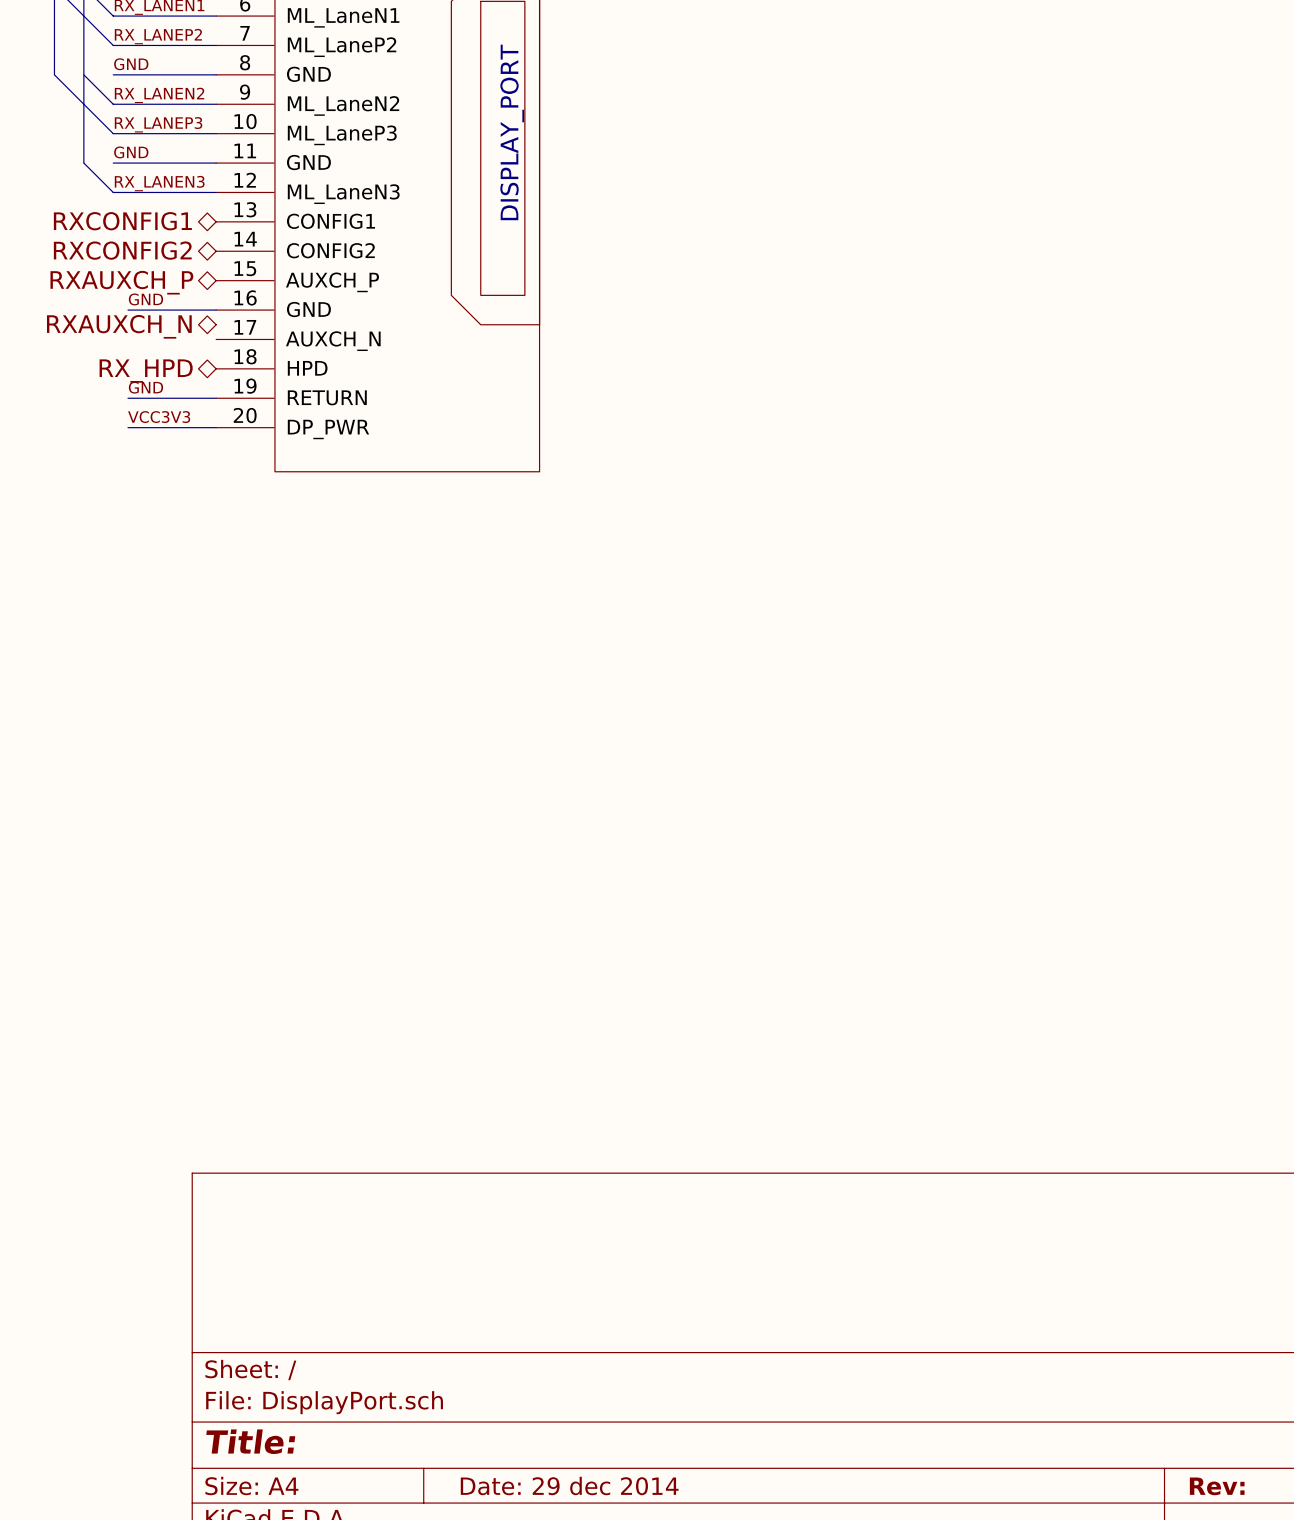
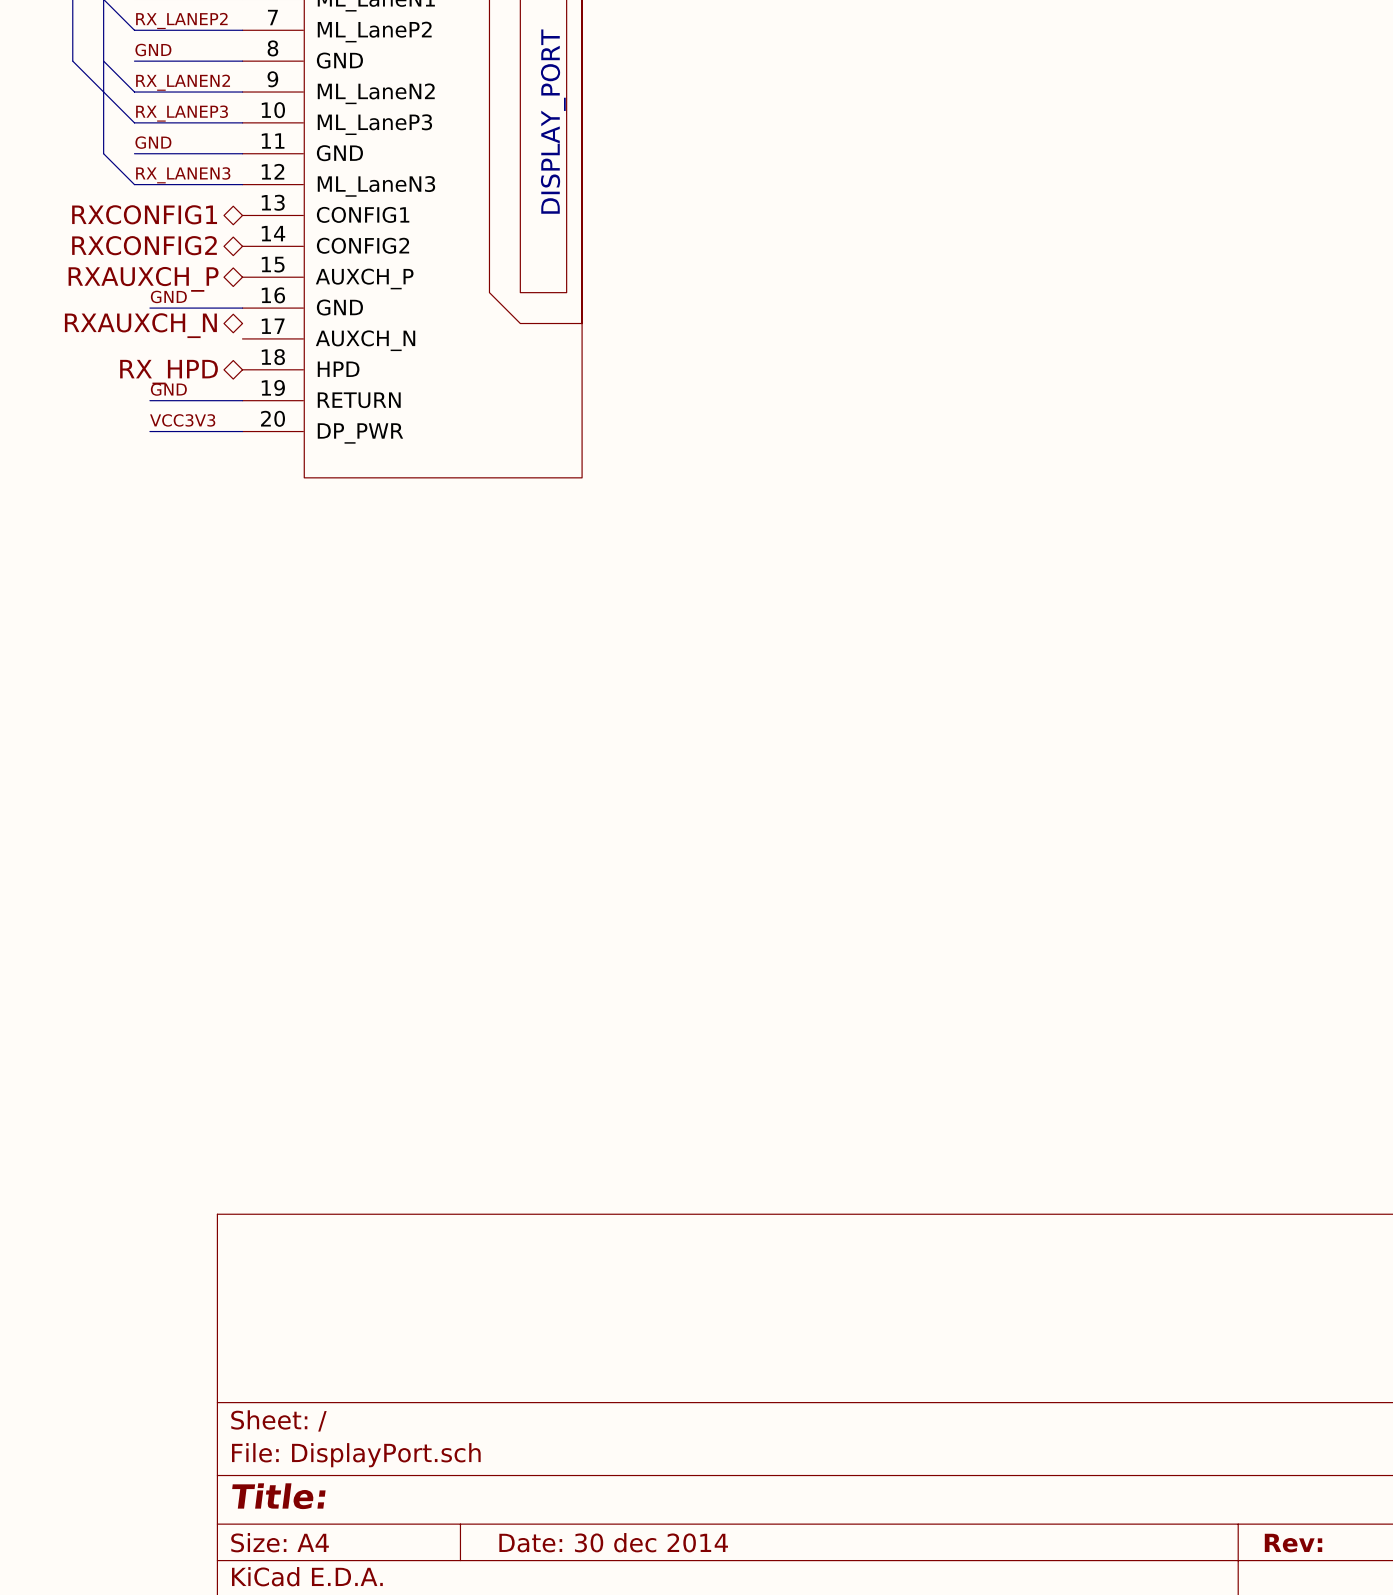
title block: Date: 29 dec 2014 (569, 1486) -> Date: 30 dec 2014 (613, 1542)

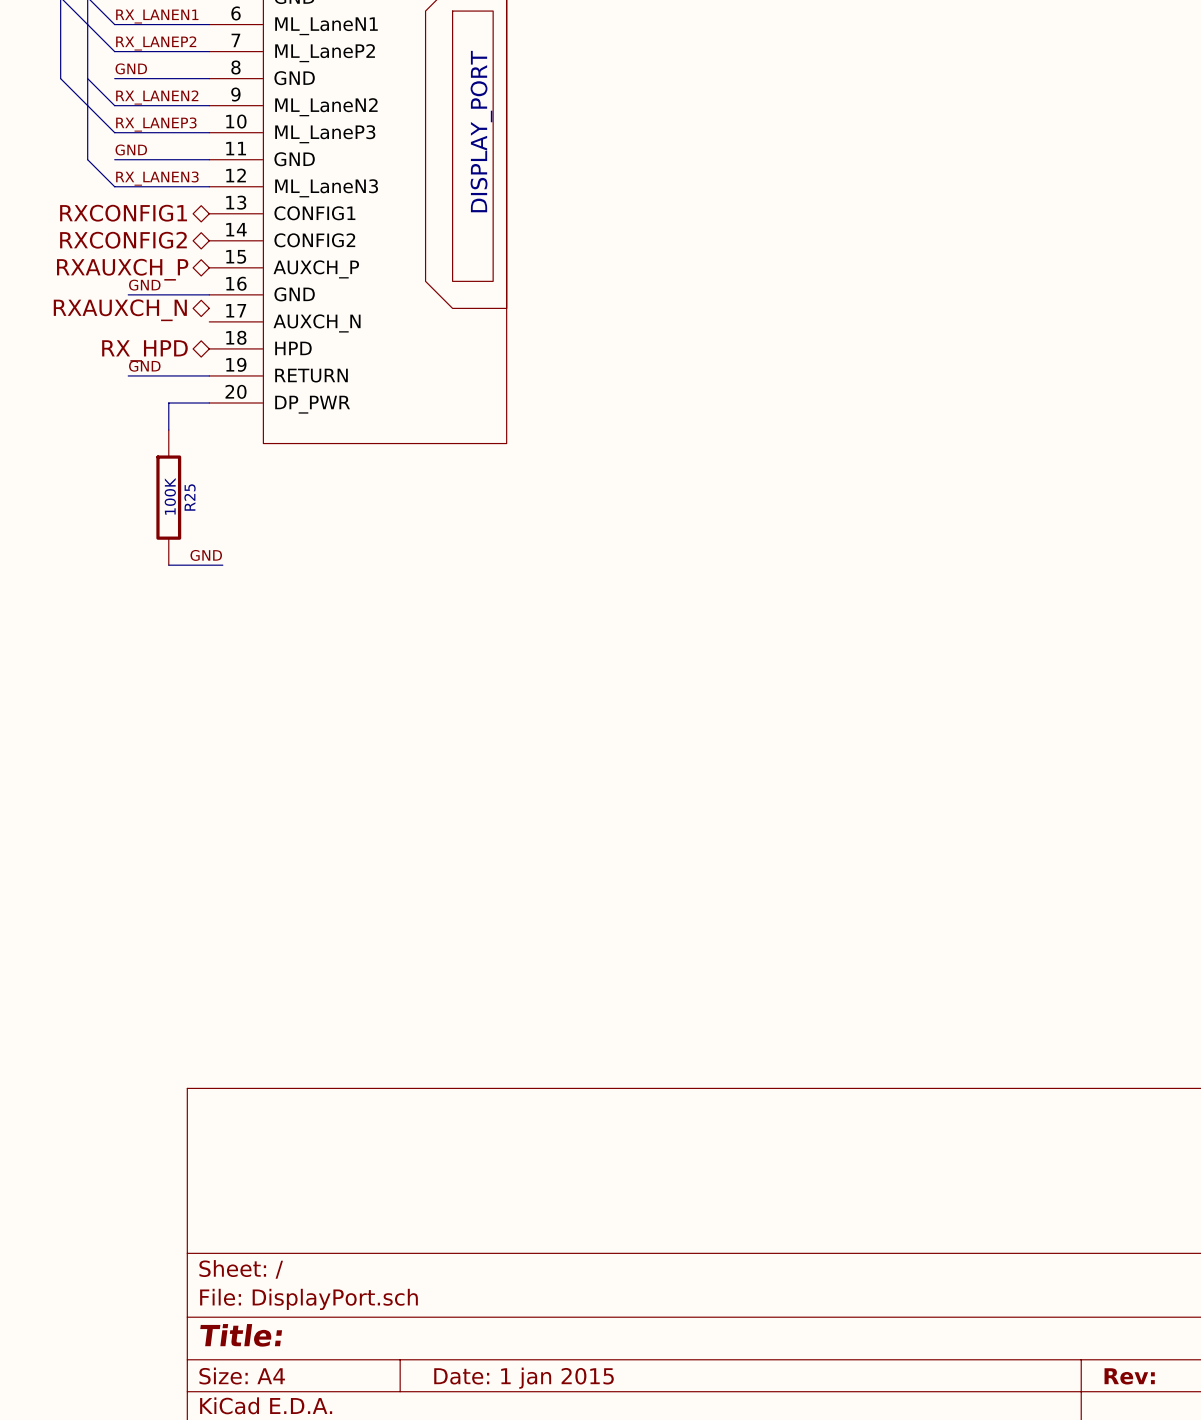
label: VCC3V3 (182, 420) -> none
wire: (149, 431) (196, 431) -> (168, 430) (168, 403)
R25: none -> 100K (168, 497)
label: none -> GND (206, 555)
wire: none -> (168, 565) (222, 565)
title block: Date: 30 dec 2014 (613, 1542) -> Date: 1 jan 2015 (524, 1378)

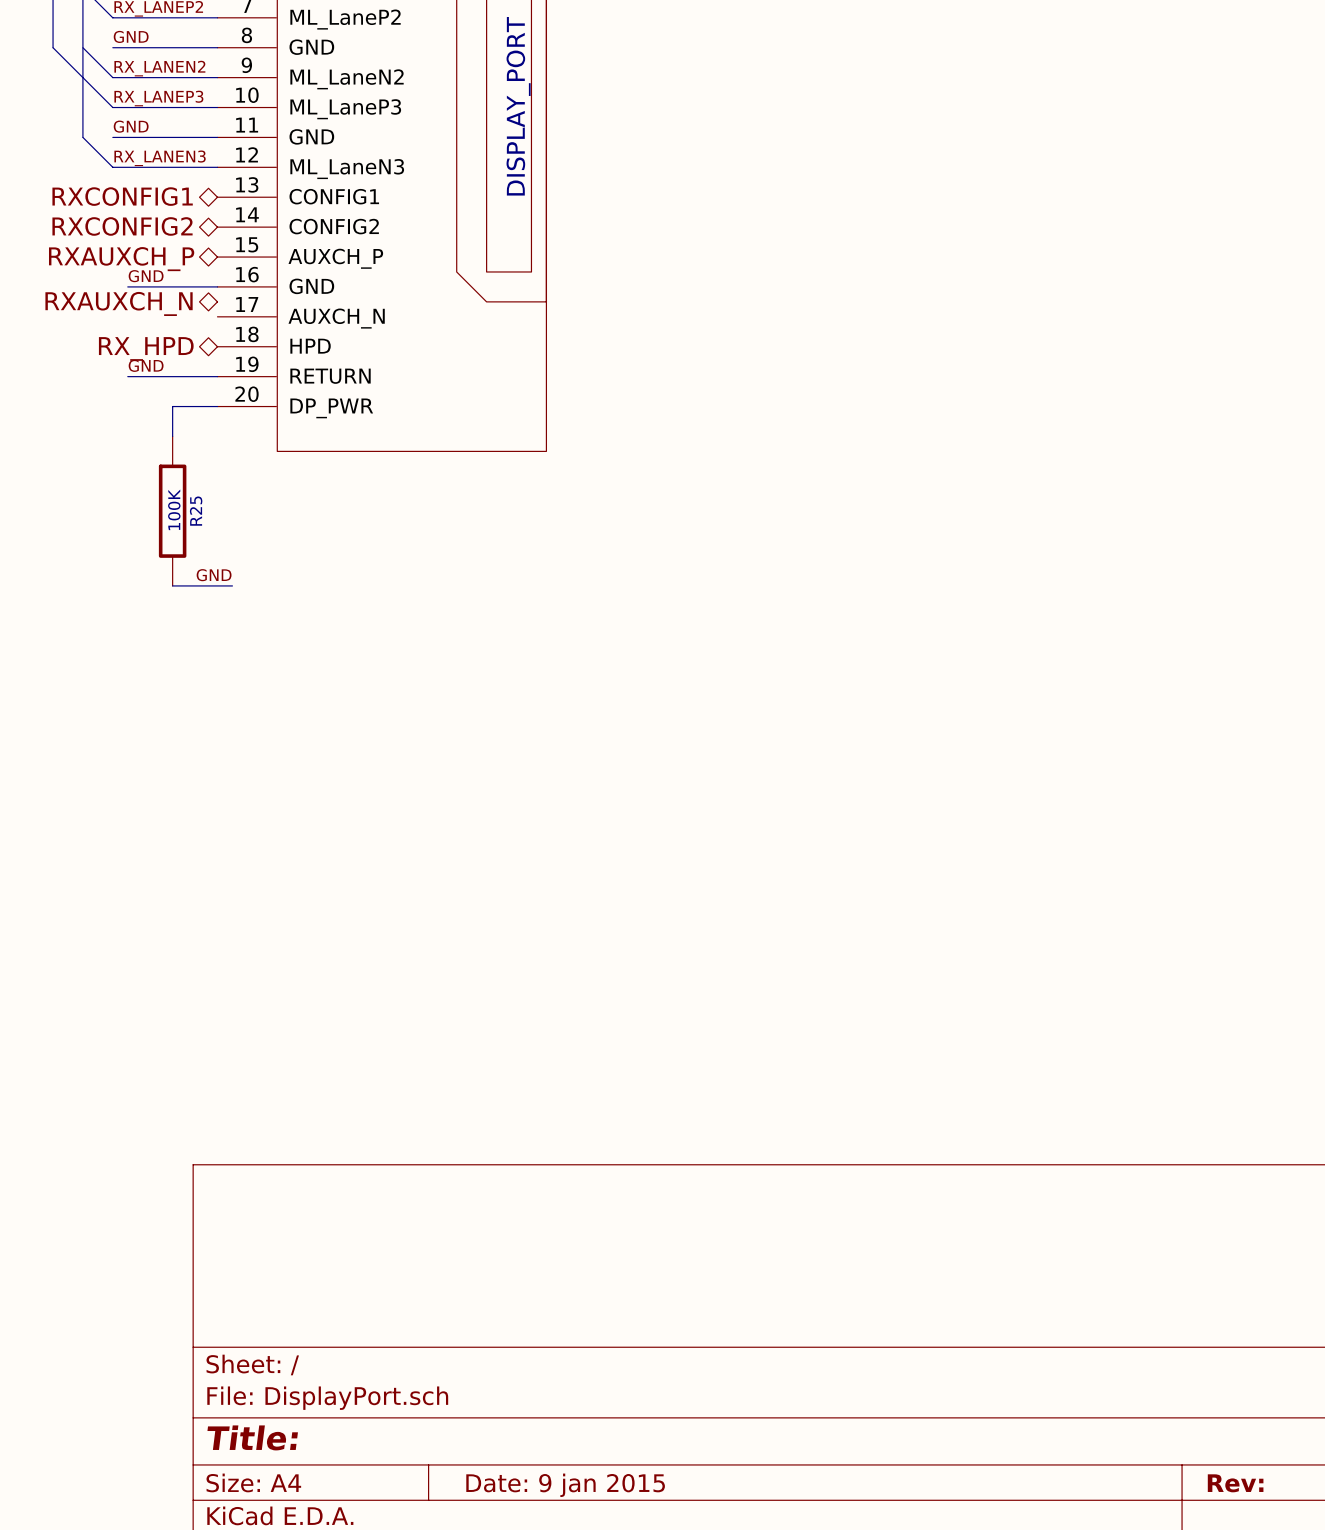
title block: Date: 1 jan 2015 (524, 1378) -> Date: 9 jan 2015 (565, 1485)

